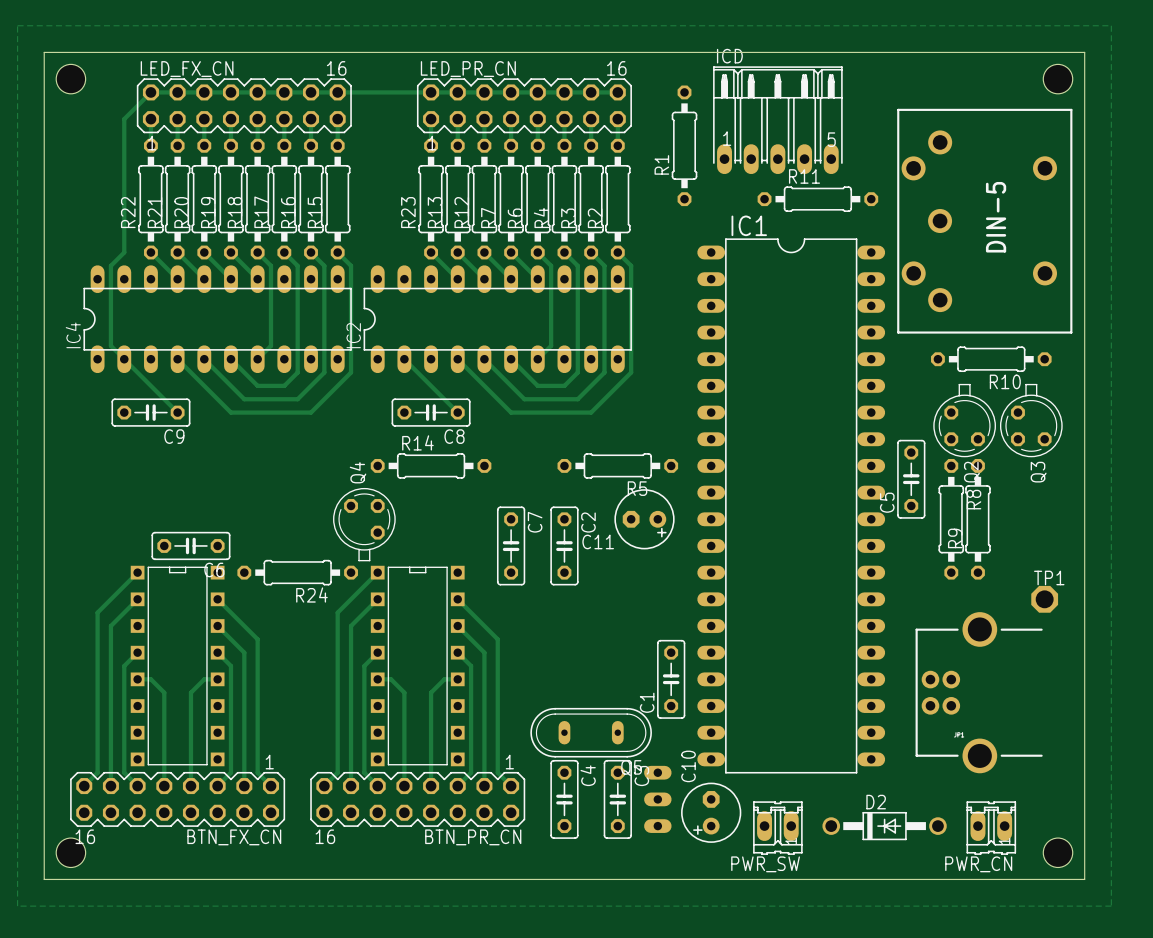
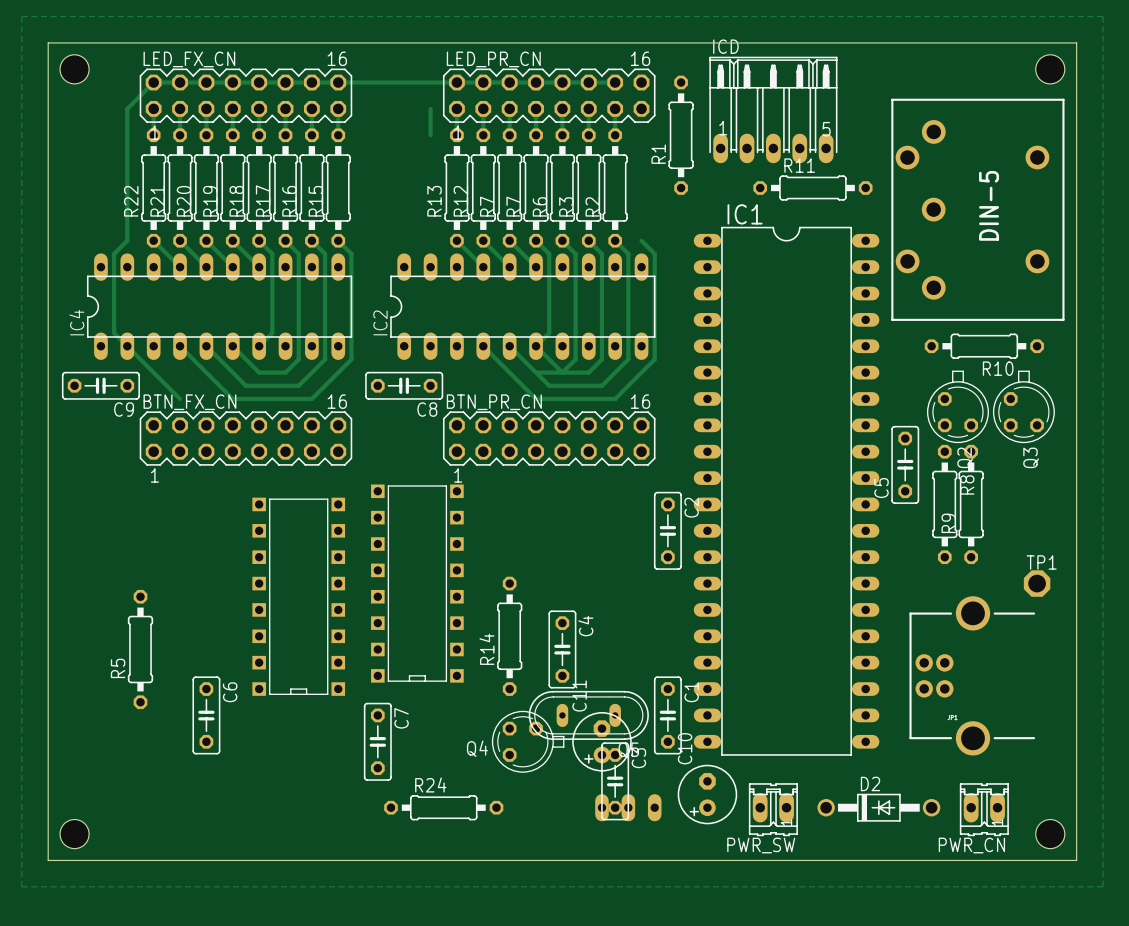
LED_PR_CN position: (524, 105) -> (549, 95)
R23: (431, 199) -> none
R4 name: R4 (541, 217) -> R6 (540, 206)
R6 name: R6 (515, 218) -> R7 (513, 206)
track: (431, 252) (457, 279) -> none
track: none -> (641, 240) (654, 253) (654, 359) (615, 398) (588, 398)
IC2 position: (497, 319) -> (522, 306)
track: (404, 359) (457, 412) -> none
track: (457, 359) (511, 412) (537, 412) -> none
track: none -> (536, 372) (549, 385)
track: (591, 385) (577, 399) -> (588, 372) (562, 372) (536, 346)
track: (524, 399) (551, 399) -> (522, 385) (536, 398)
track: (604, 399) (591, 412) -> (601, 385) (575, 385)
C9 position: (150, 412) -> (100, 385)
C8 position: (431, 412) -> (404, 385)
R14 name position: R14 (417, 442) -> R14 (486, 649)
BTN_FX_CN: none -> (245, 438)
BTN_PR_CN: none -> (549, 438)
R14 rotation: 0° (431, 465) -> 90° clockwise (509, 636)
R14 position: (431, 465) -> (509, 636)
R5 rotation: 0° (617, 465) -> 90° clockwise (140, 649)
R5 position: (617, 465) -> (140, 649)
C11 rotation: 0° (644, 519) -> 90° clockwise (601, 741)
C11 position: (644, 519) -> (601, 741)
Q4 rotation: 0° (364, 524) -> 90° counterclockwise (528, 741)
Q4 position: (364, 524) -> (528, 741)
C6 rotation: 0° (190, 545) -> 90° counterclockwise (206, 715)
C6 position: (190, 545) -> (206, 715)
C7 position: (511, 545) -> (377, 741)
C2 position: (564, 545) -> (667, 530)
track: (137, 572) (97, 612) (97, 772) (84, 786) -> none
R24 position: (297, 572) -> (443, 807)
track: (377, 572) (337, 612) (337, 772) (324, 786) -> none
R24 name position: R24 (311, 595) -> R24 (430, 784)
track: (137, 599) (110, 626) (110, 786) -> none
track: (217, 599) (257, 639) (257, 772) (271, 786) -> none
track: (377, 599) (351, 626) (351, 786) -> none
part: none -> (417, 583)
track: (457, 599) (497, 639) (497, 772) (511, 786) -> none
part: none -> (298, 596)
track: (217, 626) (244, 652) (244, 786) -> none
track: (457, 626) (484, 652) (484, 786) -> none
track: (137, 652) (124, 666) (124, 772) (137, 786) -> none
track: (217, 652) (230, 666) (230, 772) (217, 786) -> none
track: (377, 652) (364, 666) (364, 772) (377, 786) -> none
track: (457, 652) (471, 666) (471, 772) (457, 786) -> none
part: (177, 666) -> none
part: (417, 666) -> none
track: (137, 679) (150, 679) (164, 692) (164, 786) -> none
track: (217, 679) (204, 679) (190, 692) (190, 786) -> none
track: (377, 679) (391, 679) (404, 692) (404, 786) -> none
track: (457, 679) (444, 679) (431, 692) (431, 786) -> none
C1 rotation: 0° (671, 679) -> 180° (667, 715)
C1 position: (671, 679) -> (667, 715)
BTN_FX_CN: (177, 799) -> none
BTN_PR_CN: (417, 799) -> none
C4 position: (564, 799) -> (562, 649)
part rotation: 0° (657, 799) -> 90° clockwise (628, 807)

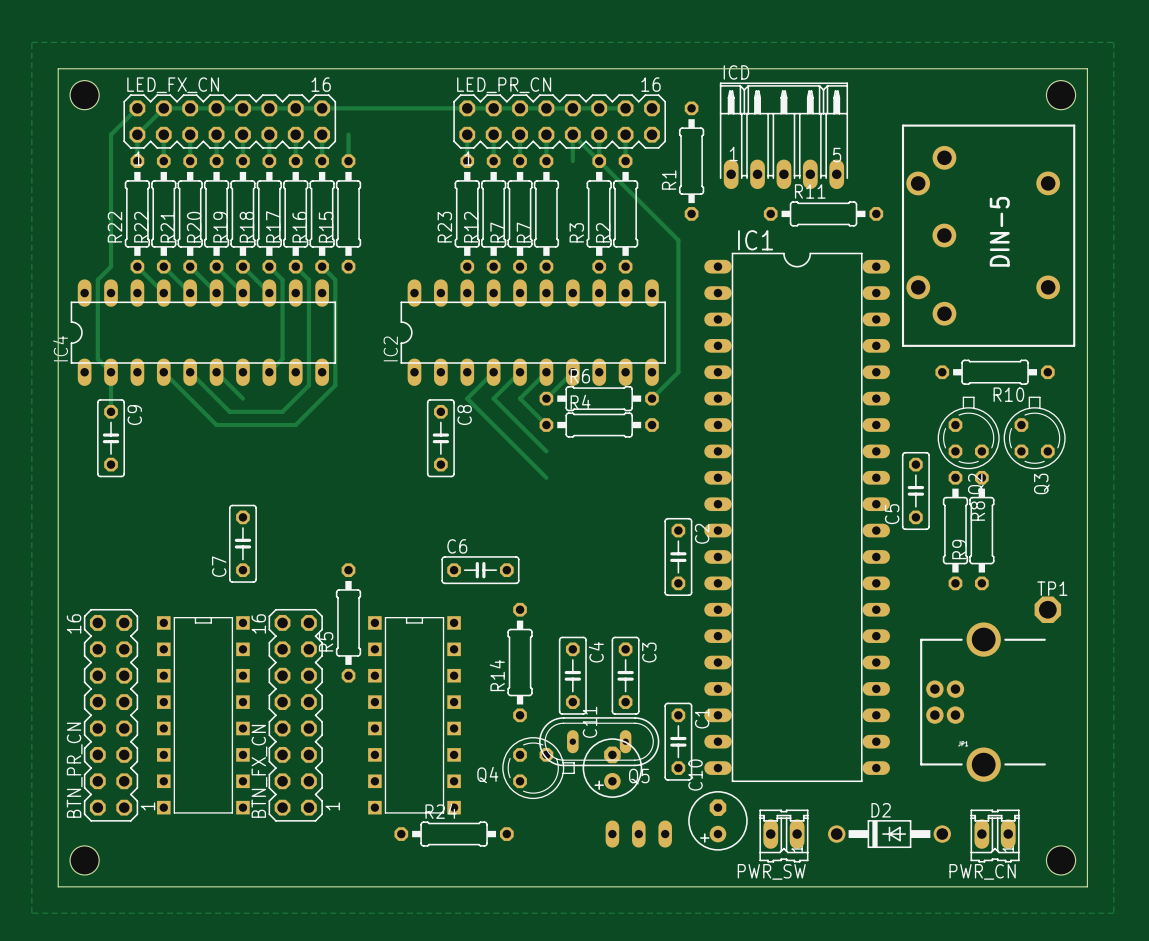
track: none -> (137, 108) (111, 134) (111, 266) (97, 279) (97, 359) (111, 372) (111, 411)
LED_FX_CN position: (245, 95) -> (229, 121)
track: (430, 108) (430, 135) -> none
track: (127, 135) (127, 240) (114, 253) (114, 333) (180, 398) -> none
R22: none -> (137, 213)
R6 rotation: 0° (562, 188) -> 90° clockwise (599, 398)
R6 position: (562, 188) -> (599, 398)
R13 name: R13 (434, 201) -> R23 (444, 227)
track: none -> (137, 266) (163, 293)
track: (338, 240) (351, 253) (351, 359) (311, 398) (285, 398) -> none
track: (456, 240) (483, 267) -> none
track: (483, 240) (509, 267) -> none
track: (509, 240) (536, 267) -> none
track: (536, 240) (549, 253) (549, 333) (536, 346) (562, 372) (575, 359) (575, 253) (562, 240) -> none
track: (588, 240) (601, 253) (601, 359) (588, 372) (536, 372) -> (572, 372) (546, 398)
track: (615, 240) (628, 253) (628, 359) (601, 385) (549, 385) (509, 346) -> (546, 451) (493, 398) (520, 372)
track: (641, 240) (654, 253) (654, 359) -> (572, 134) (678, 240) (678, 372) (665, 385)
IC4 position: (219, 306) -> (203, 332)
track: none -> (163, 372) (216, 425) (242, 425)
track: (232, 346) (259, 372) (285, 372) -> (282, 411) (295, 398)
track: (483, 346) (509, 372) -> (546, 372) (520, 398)
track: none -> (493, 372) (467, 398) (546, 477)
track: (232, 372) (245, 385) -> none
track: (641, 372) (615, 398) (536, 398) -> none
C9 rotation: 0° (100, 385) -> 90° counterclockwise (111, 438)
track: (219, 385) (232, 398) -> (229, 411) (256, 411)
track: (272, 385) (298, 385) -> (295, 425) (308, 411)
C8 rotation: 0° (404, 385) -> 90° counterclockwise (440, 438)
R4: none -> (599, 425)
BTN_FX_CN rotation: 0° (245, 438) -> 90° counterclockwise (295, 715)
BTN_FX_CN position: (245, 438) -> (295, 715)
BTN_PR_CN: (549, 438) -> none
part: (417, 583) -> none
part: (298, 596) -> none
R5 position: (140, 649) -> (348, 622)
BTN_PR_CN: none -> (111, 715)
part: none -> (203, 715)
part: none -> (414, 715)
C6 rotation: 0° (206, 715) -> 90° counterclockwise (480, 570)
C6 position: (206, 715) -> (480, 570)
C7 rotation: 0° (377, 741) -> 180° (242, 543)
C7 position: (377, 741) -> (242, 543)
C3 position: (615, 781) -> (625, 675)

